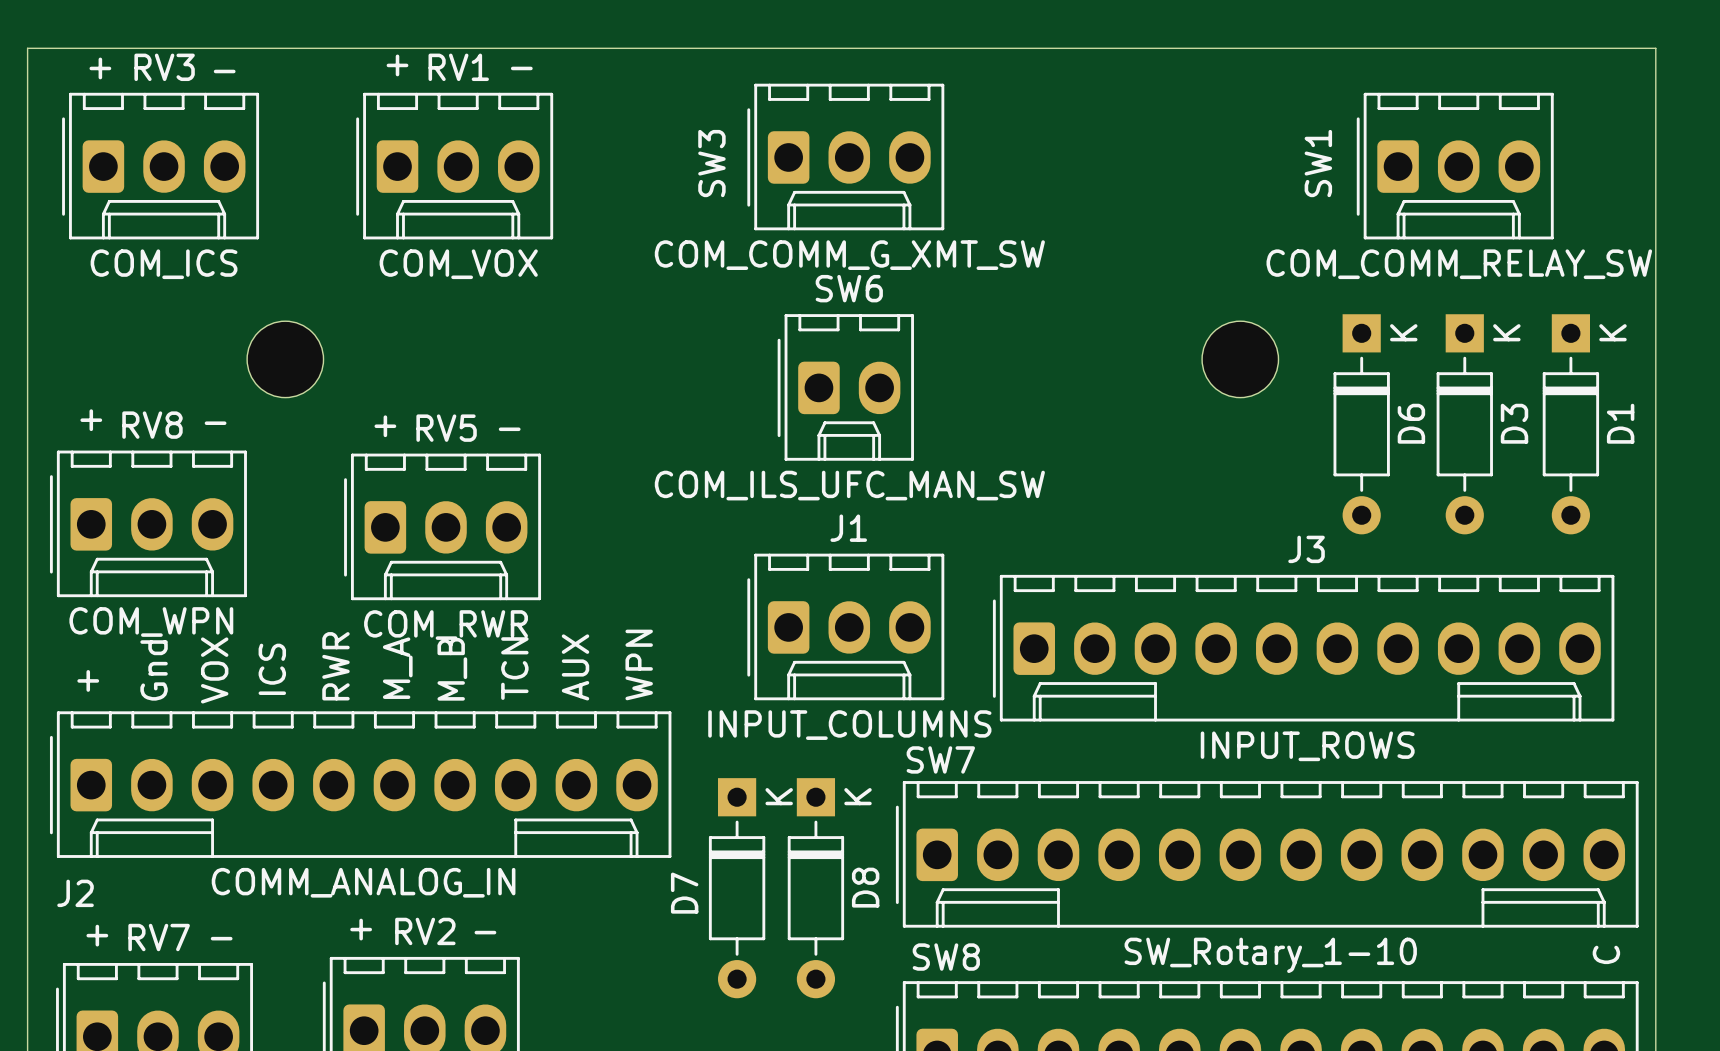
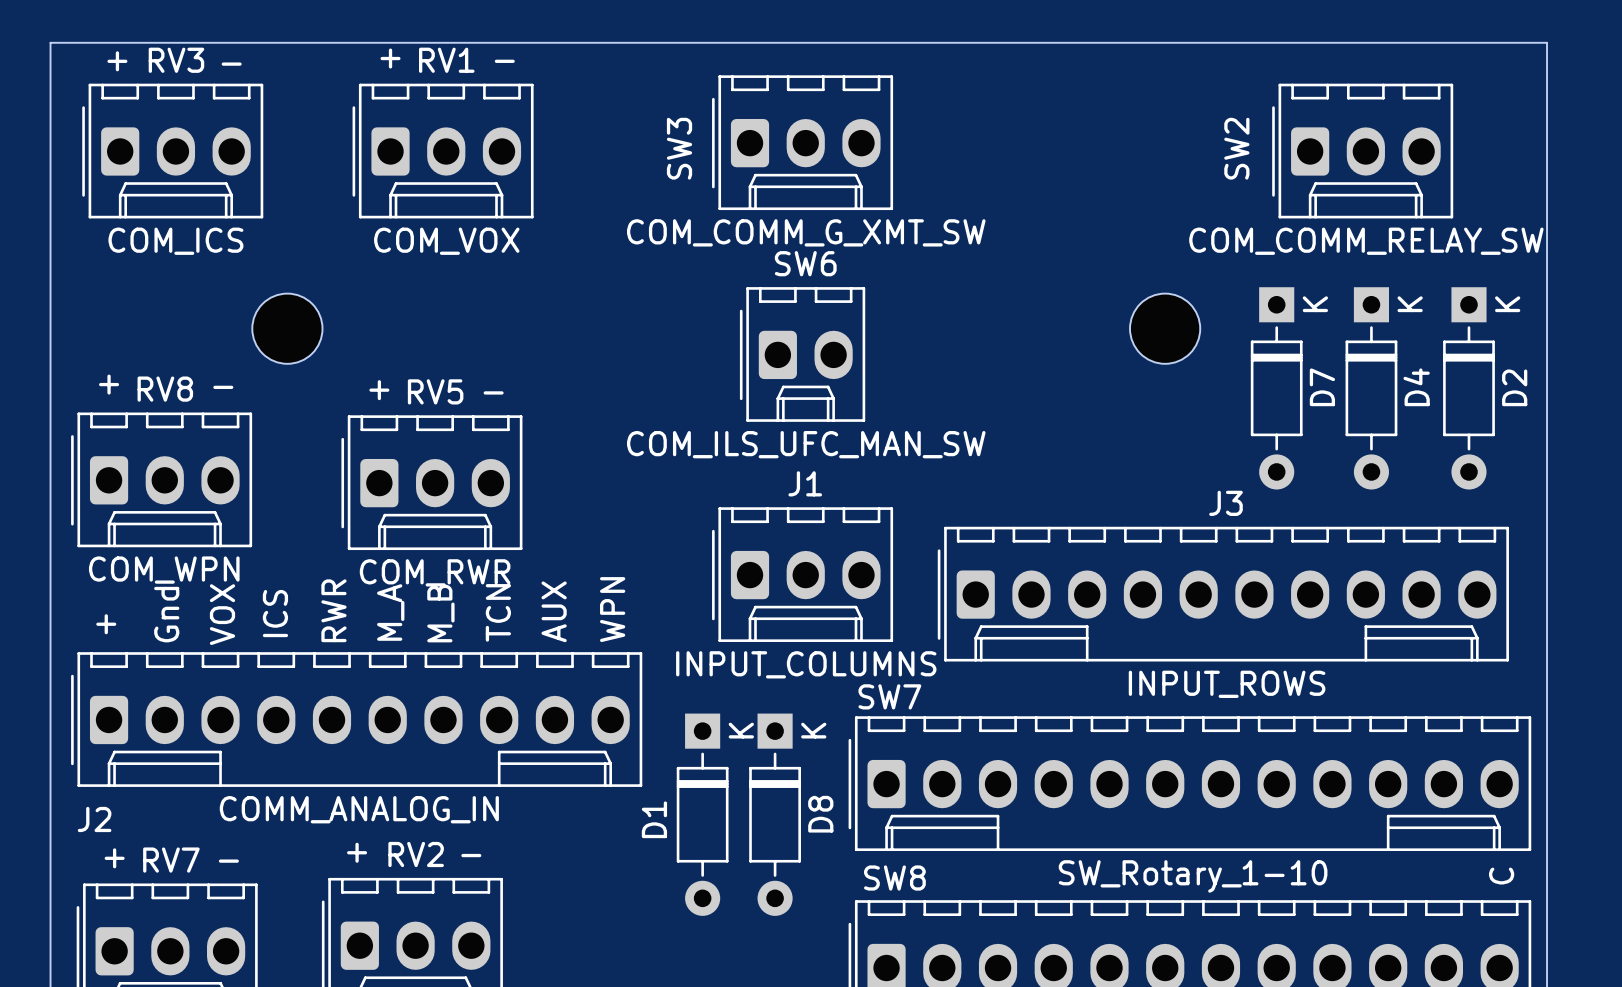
SW1 name: SW1 (1318, 163) -> SW2 (1236, 148)
D6 name: D6 (1411, 423) -> D7 (1322, 387)
D3 name: D3 (1514, 423) -> D4 (1416, 387)
D1 name: D1 (1620, 423) -> D2 (1514, 387)
D7 name: D7 (684, 893) -> D1 (654, 819)

